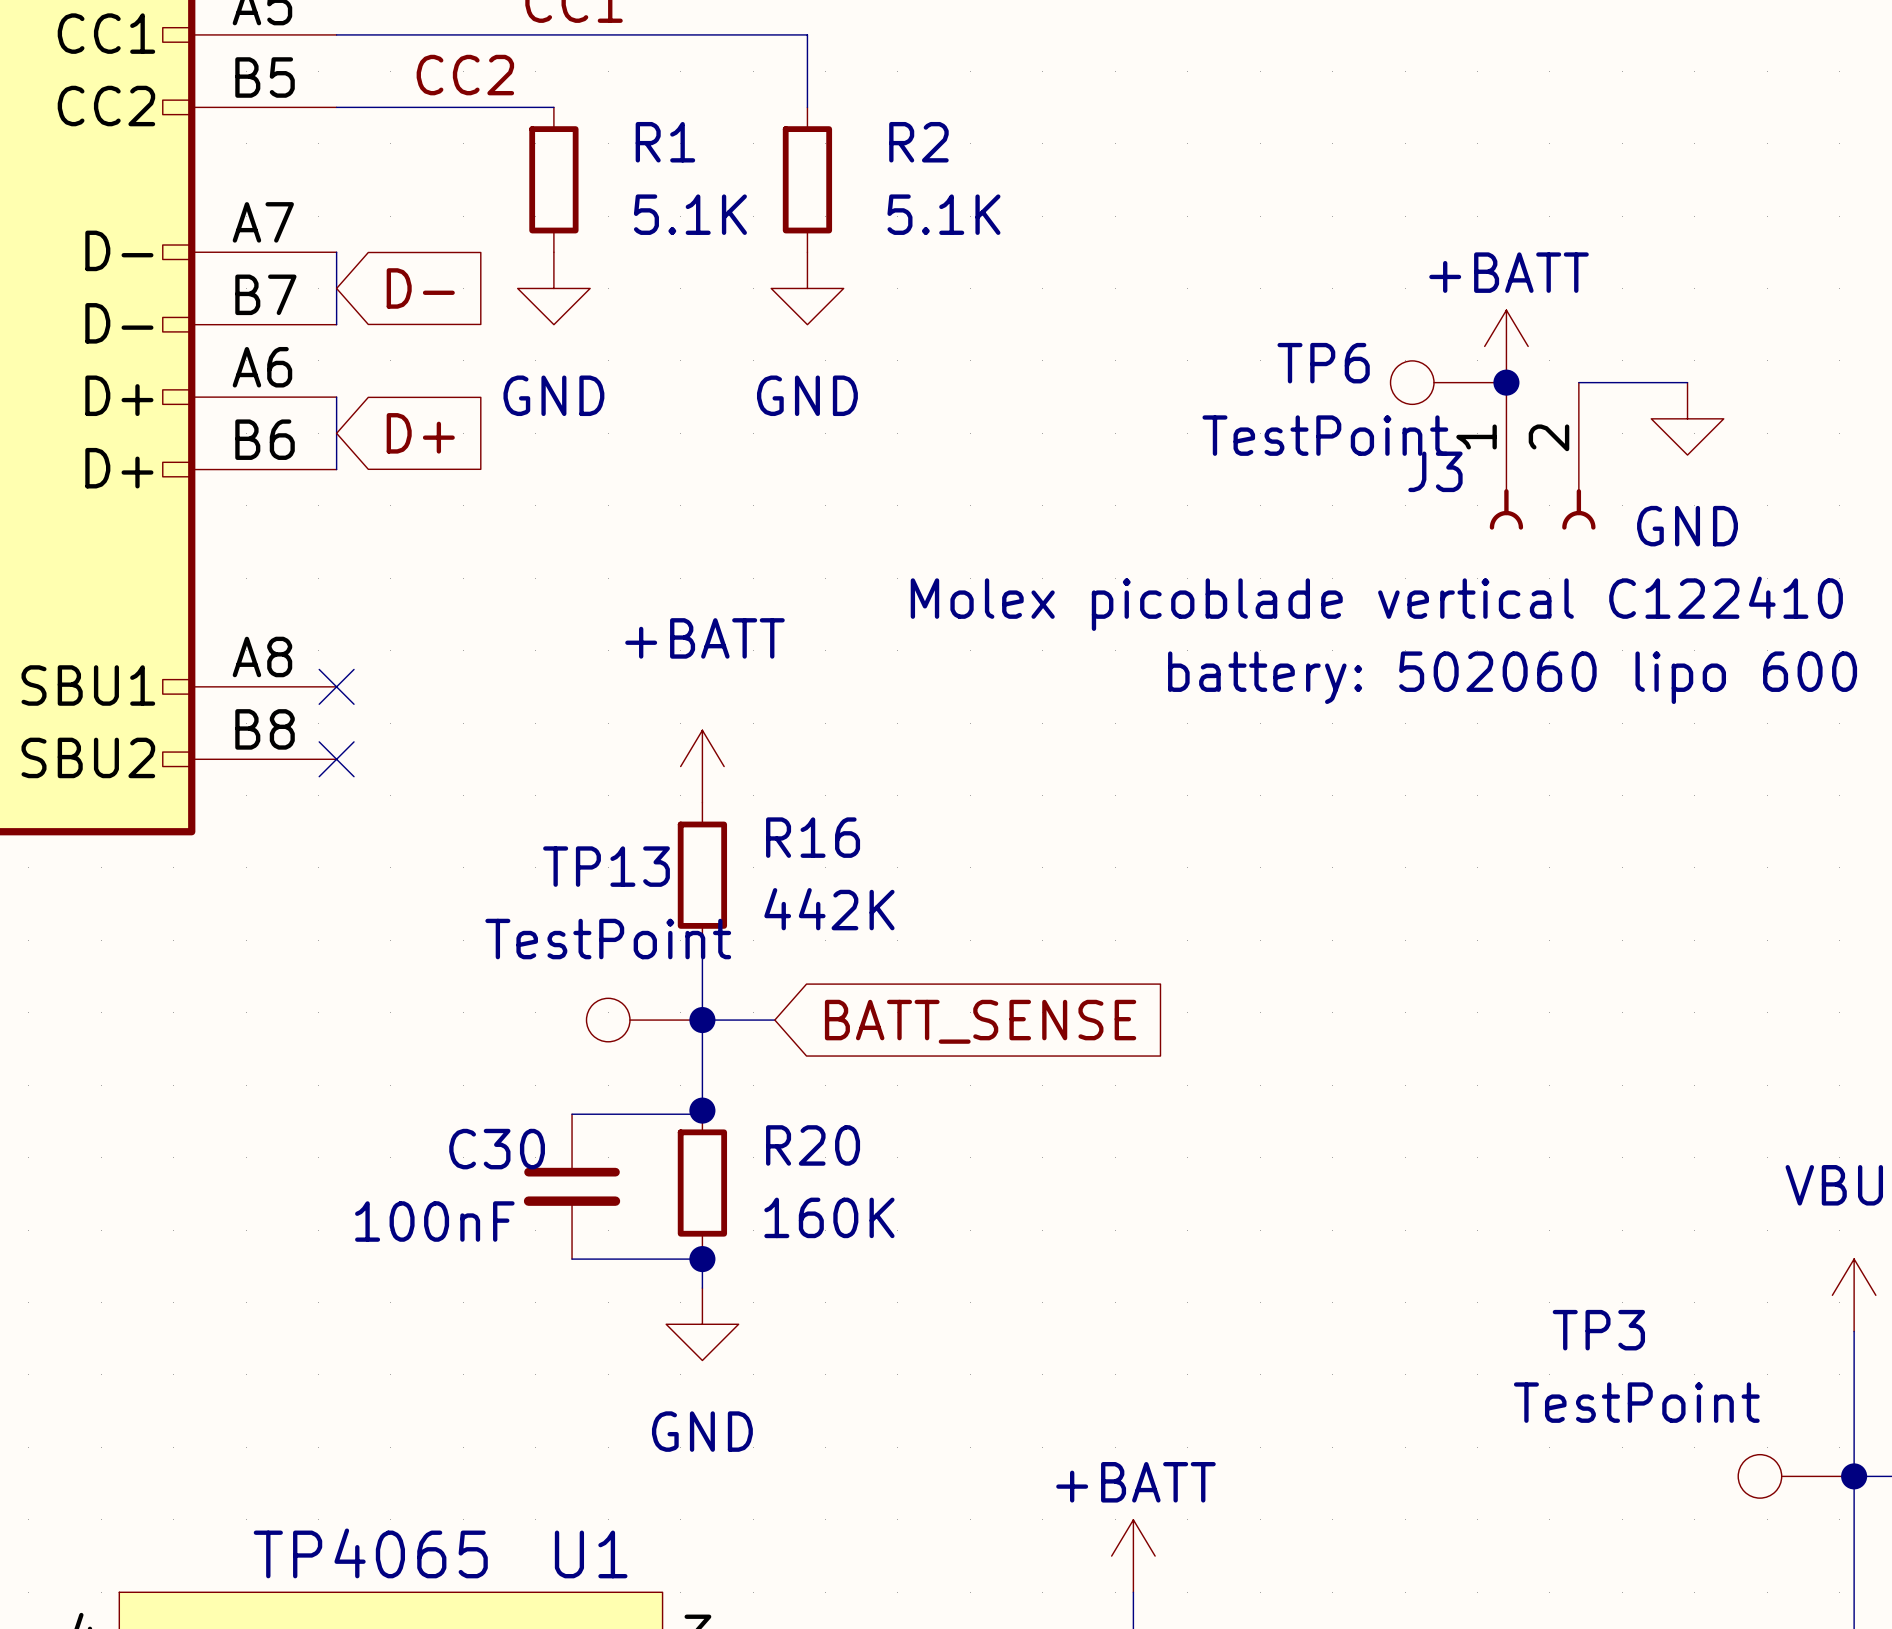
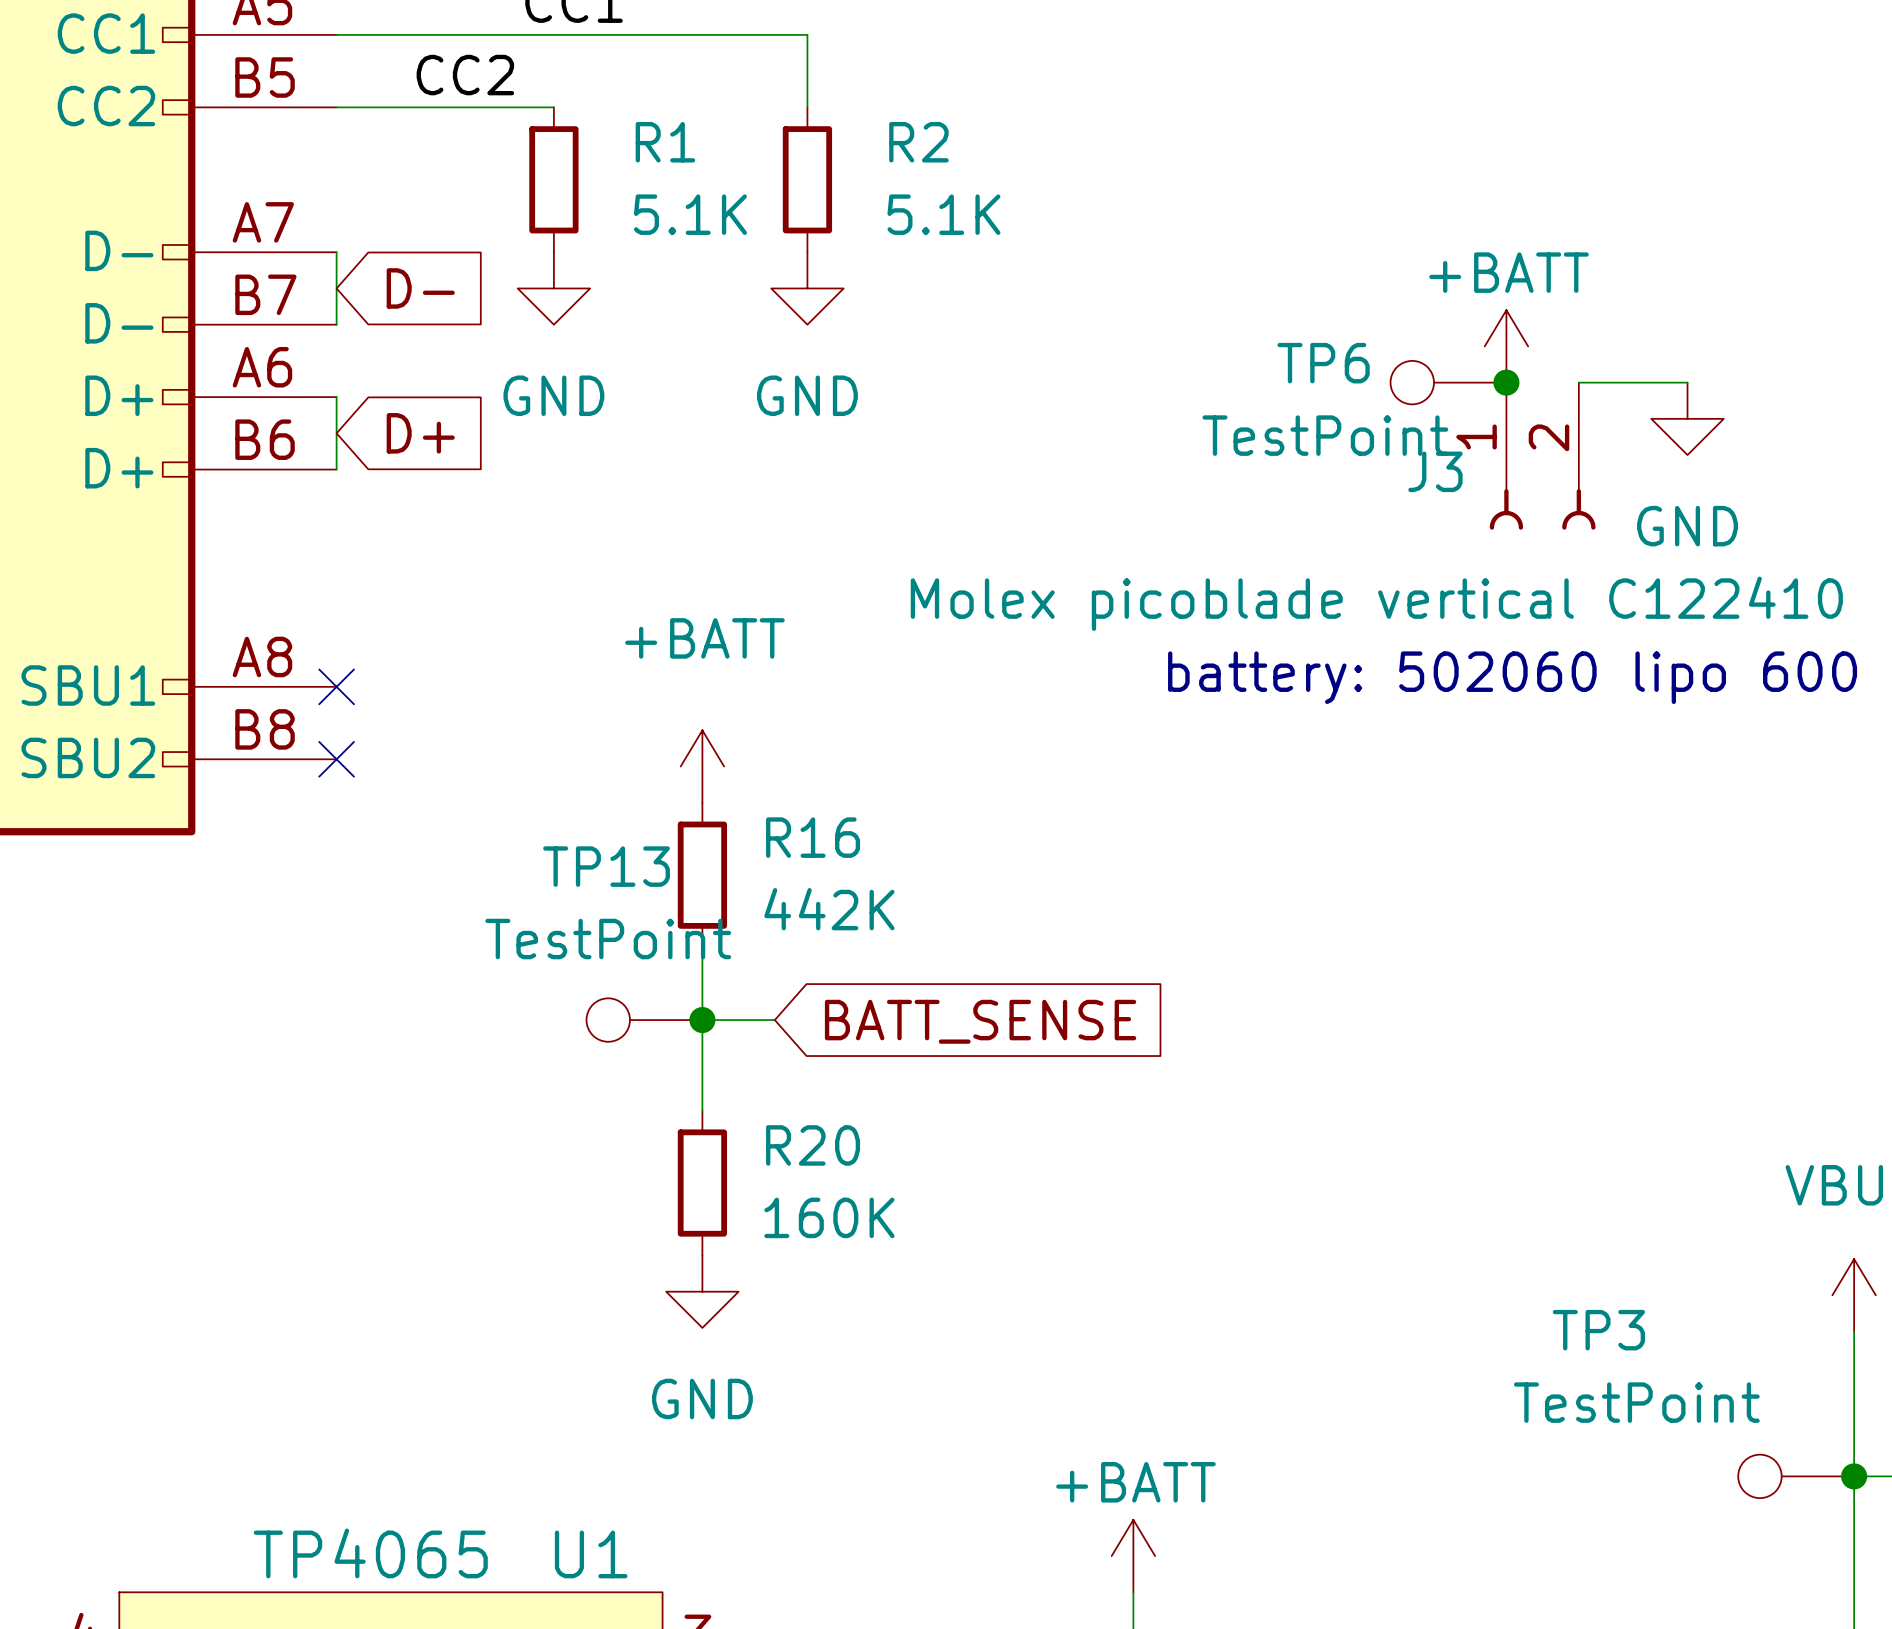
wire: (702, 1110) (702, 1114) (572, 1114) -> none
junction: (702, 1110) -> none
C30: 100nF (572, 1186) -> none
wire: (572, 1259) (702, 1259) -> none
junction: (702, 1259) -> none
power symbol position: GND (702, 1324) -> GND (702, 1291)

